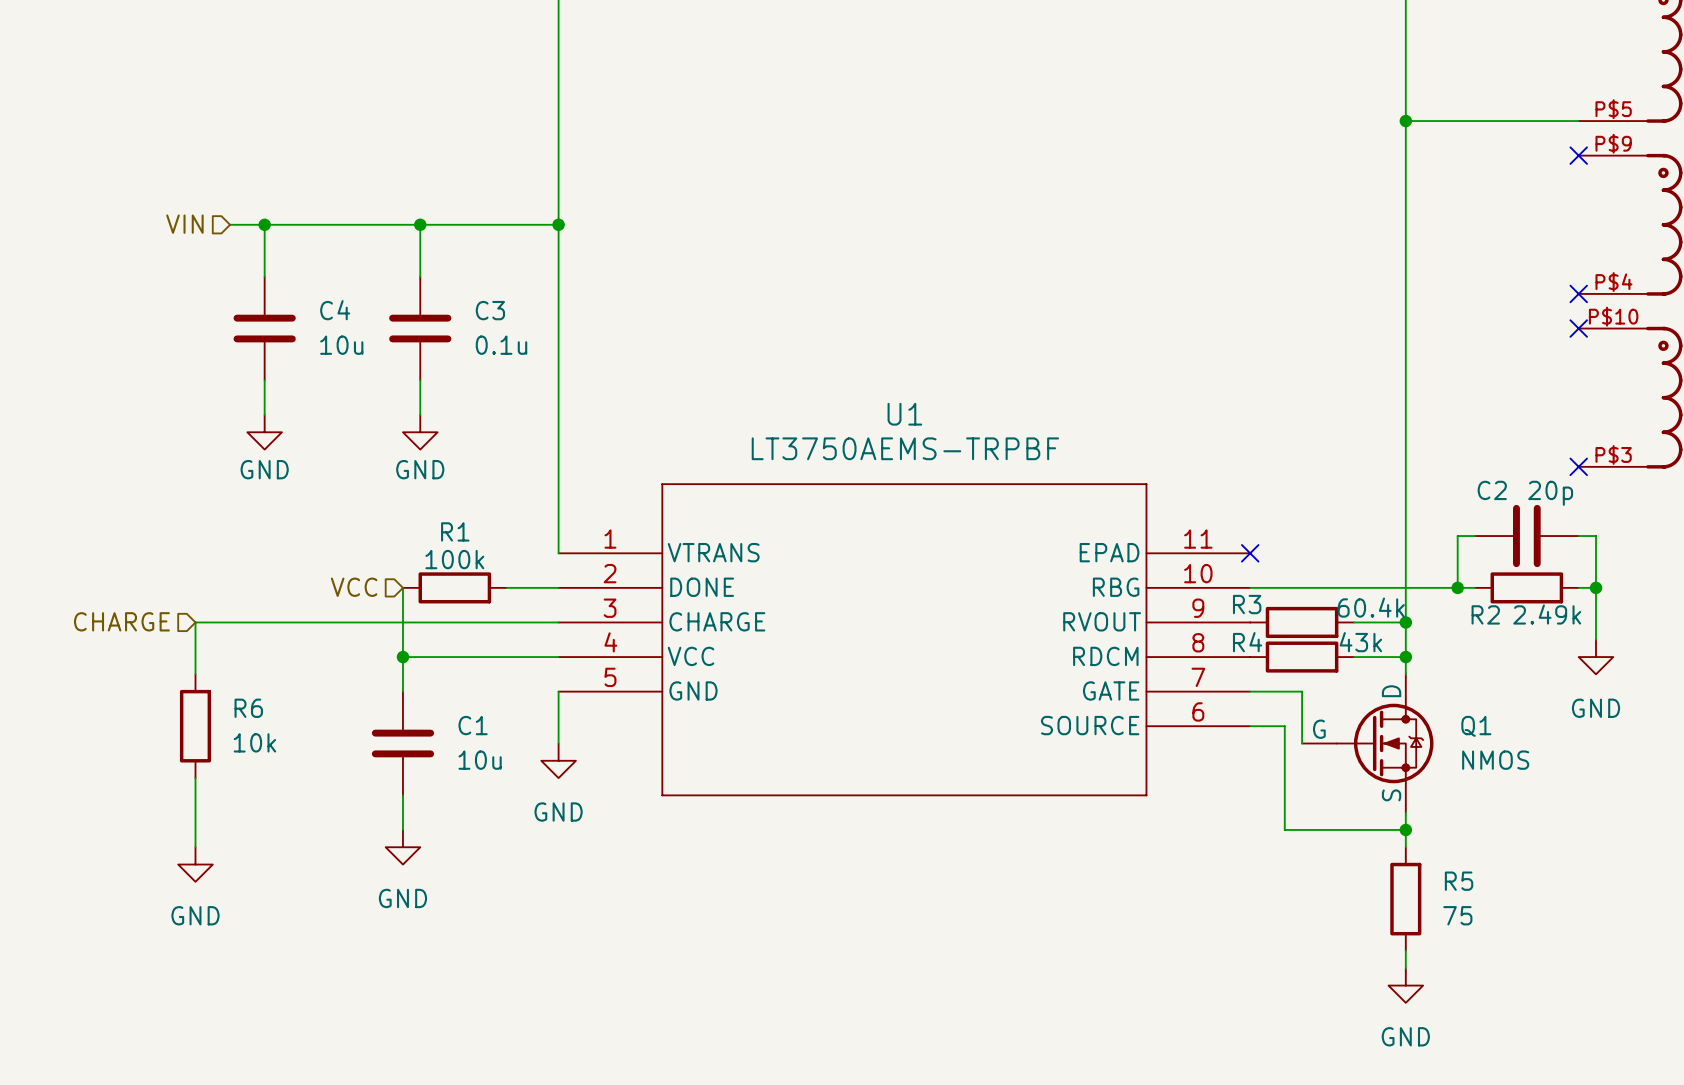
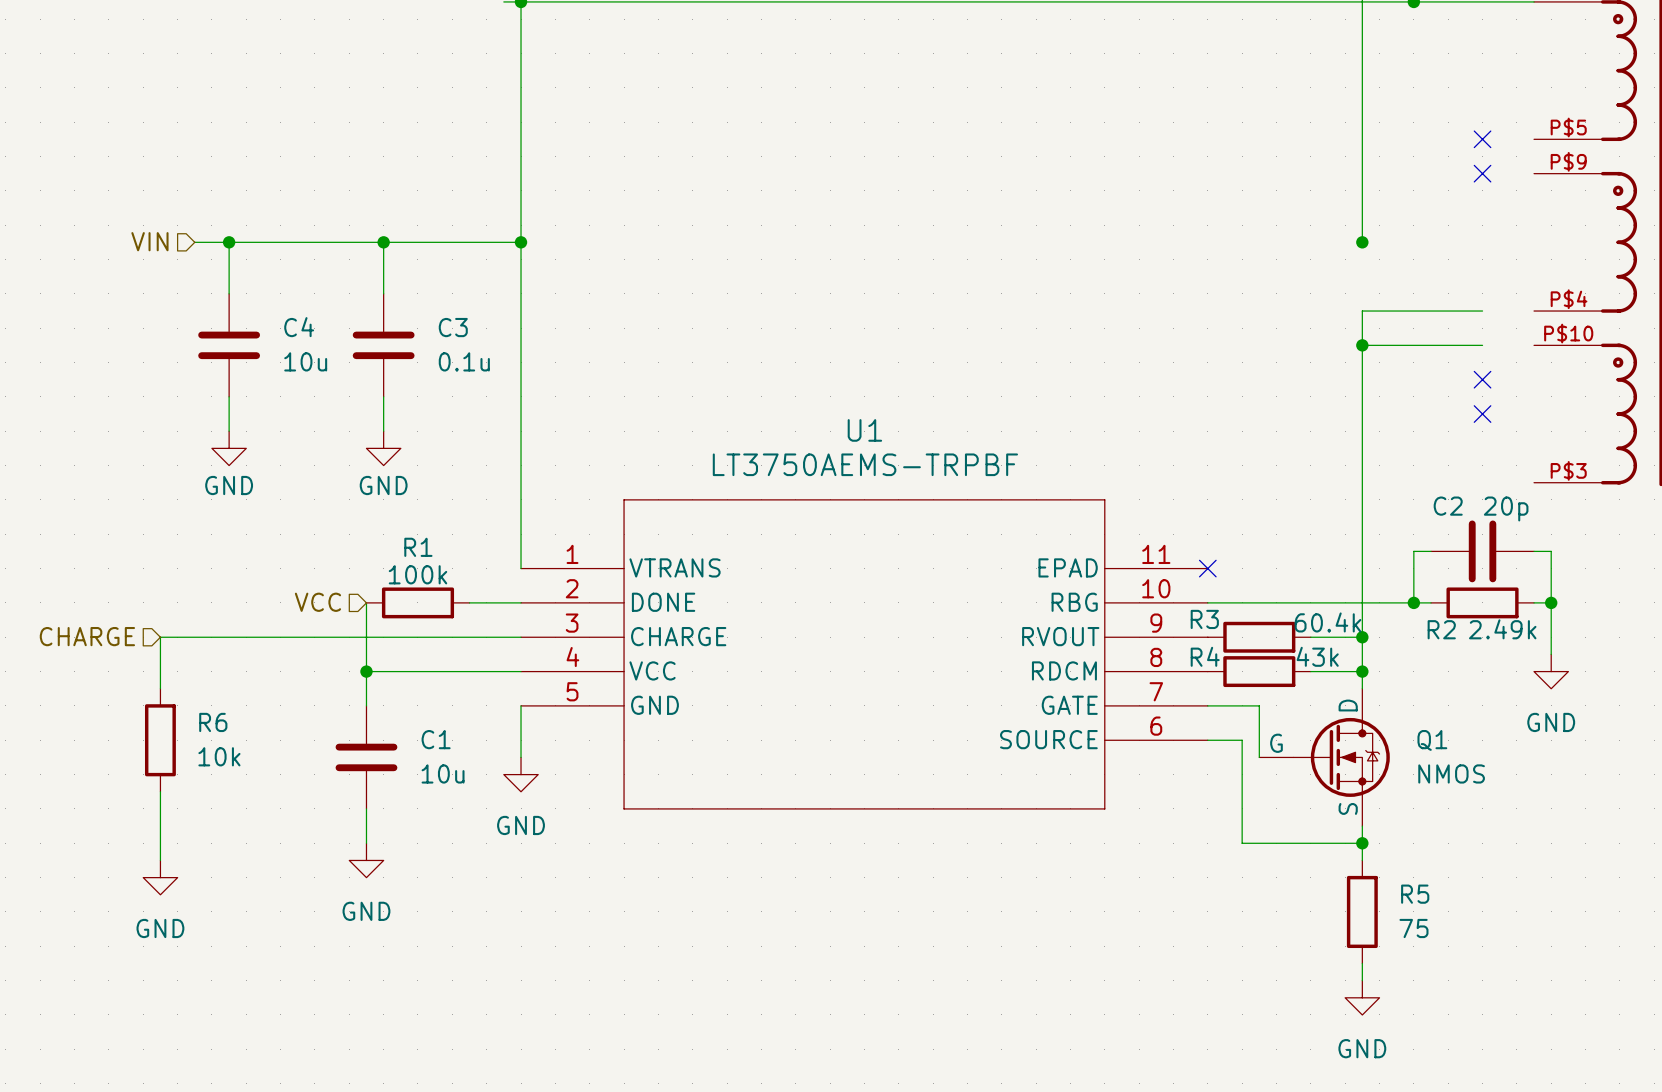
wire: (1405, 121) (1578, 121) -> none
junction: (1405, 121) -> none
no-connect mark: none -> (1482, 139)
no-connect mark: none -> (1482, 173)
no-connect mark: (1578, 155) -> none
wire: (1405, 224) (1405, 293) -> (1482, 311) (1362, 311)
junction: none -> (1362, 242)
no-connect mark: (1578, 293) -> none
wire: none -> (1362, 345) (1482, 345)
junction: none -> (1362, 345)
no-connect mark: (1578, 328) -> none
no-connect mark: none -> (1482, 379)
no-connect mark: none -> (1482, 414)
no-connect mark: (1578, 466) -> none

